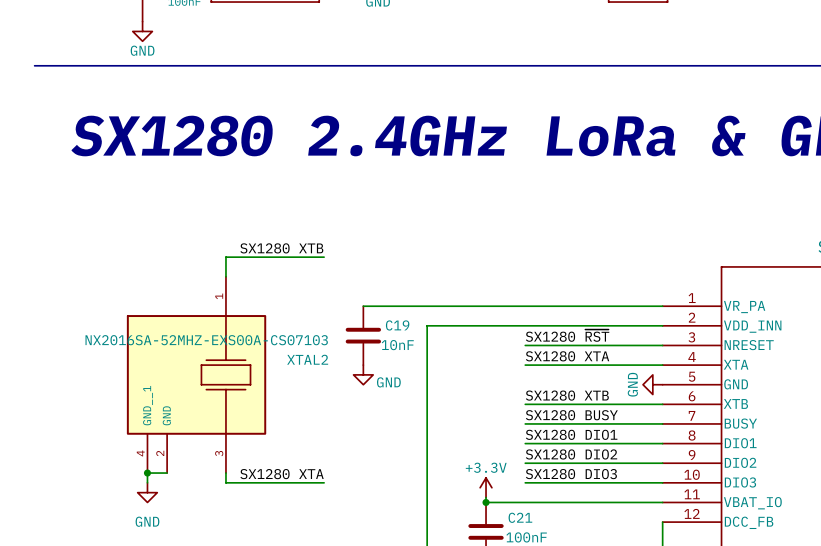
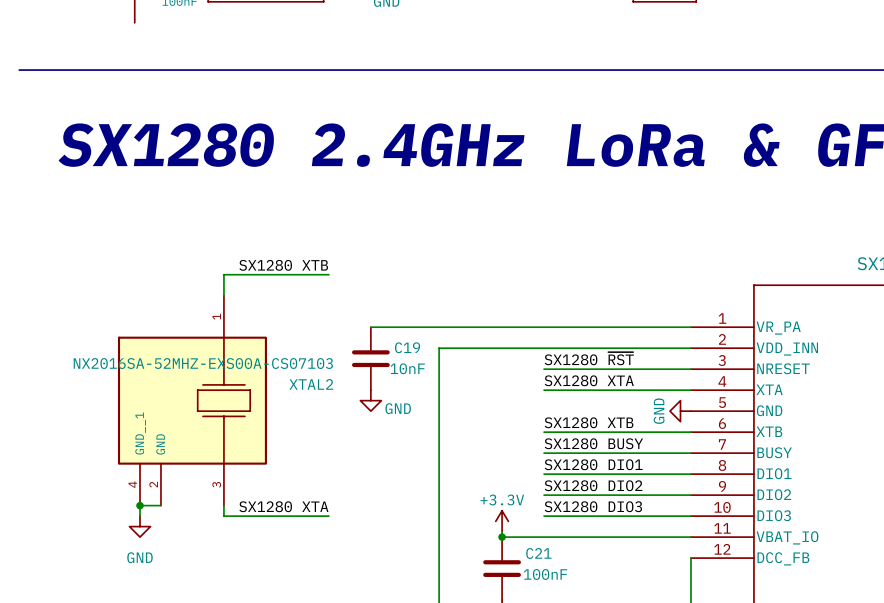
power symbol: GND (142, 31) -> none

